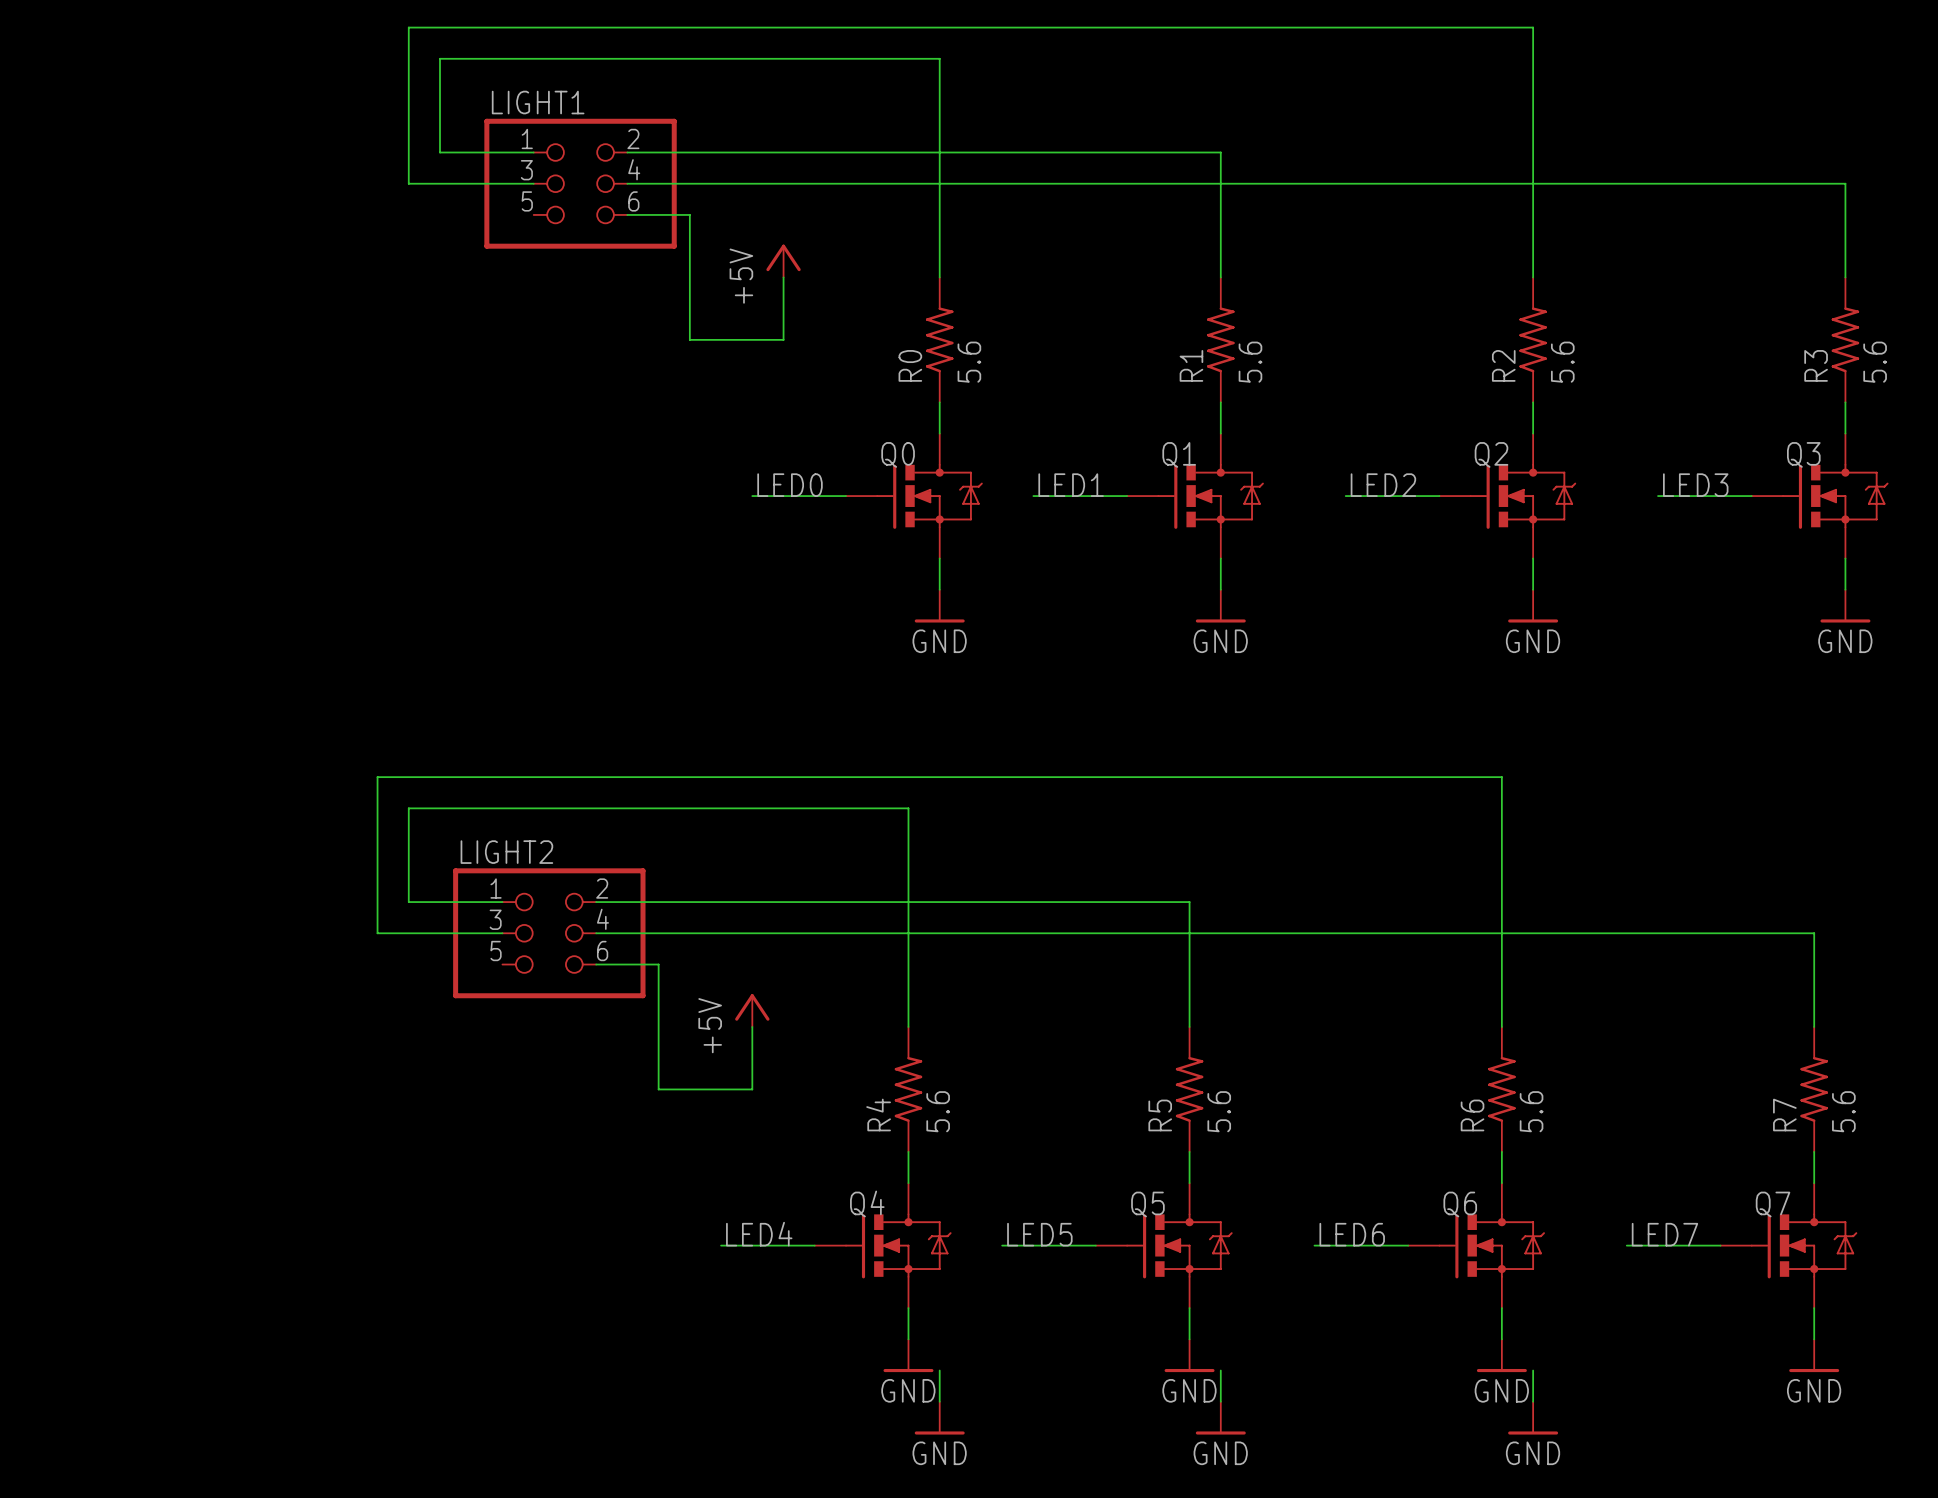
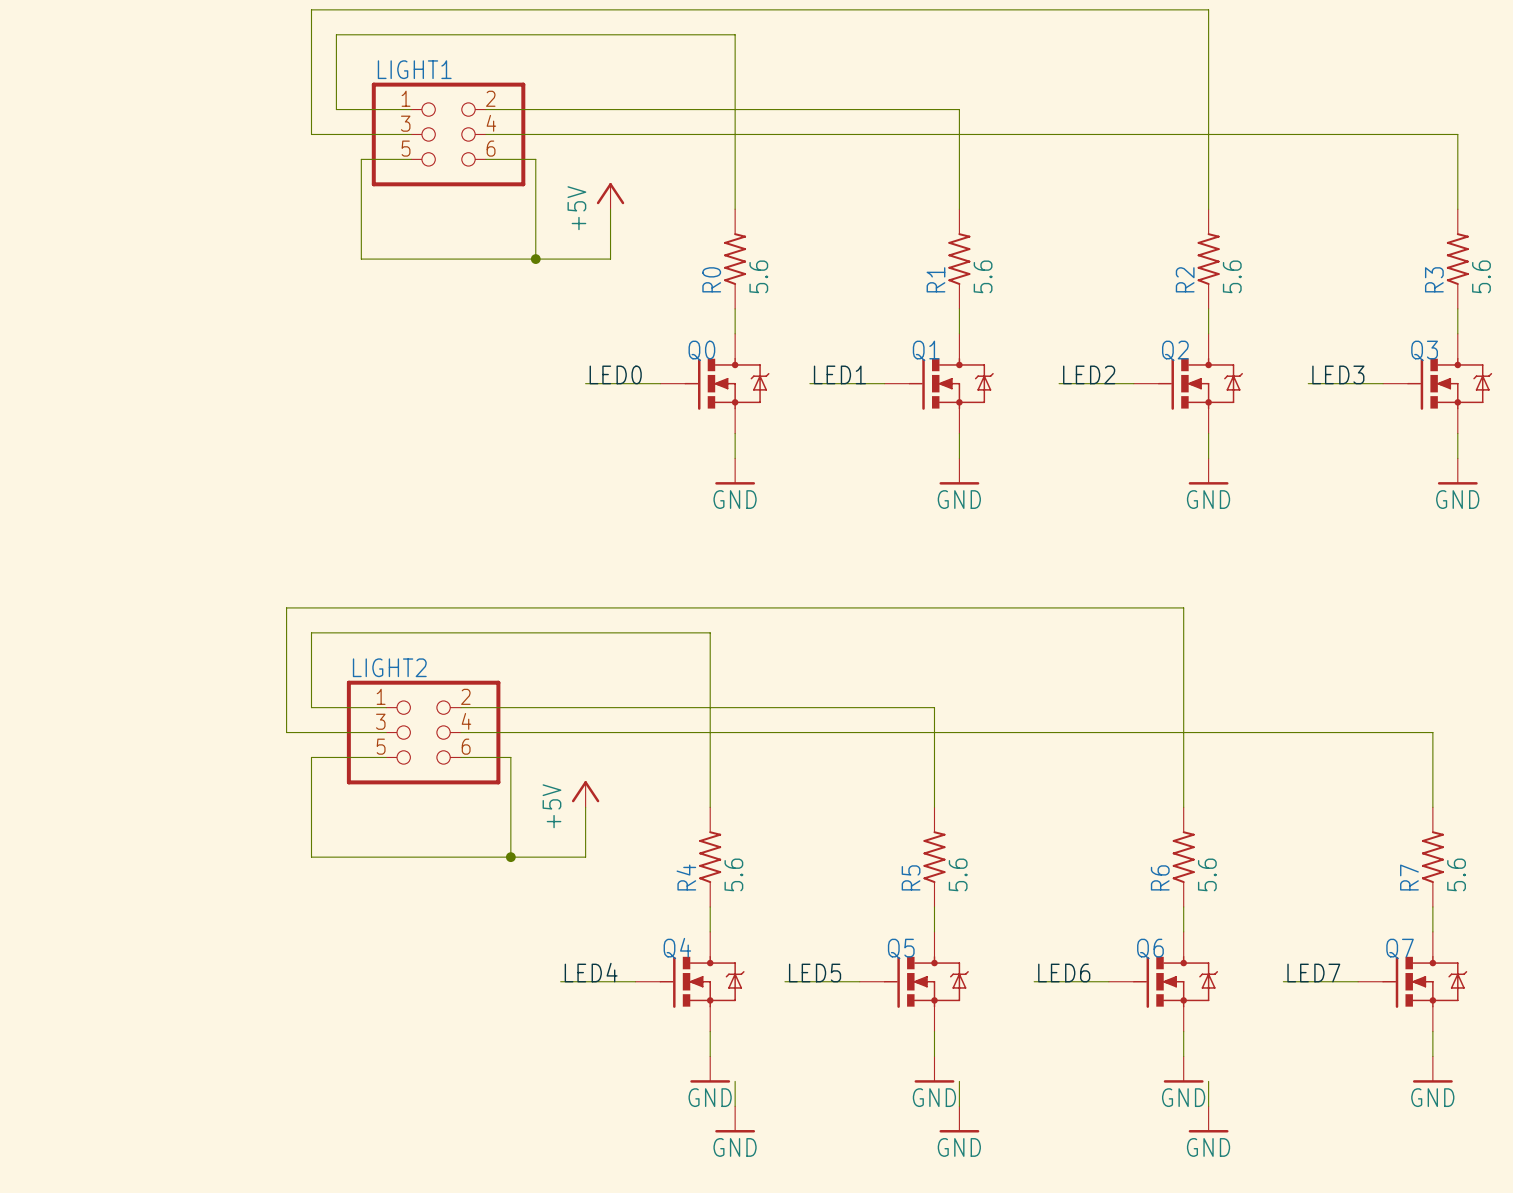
wire: none -> (411, 159) (361, 159) (361, 259) (535, 259)
junction: none -> (535, 259)
wire: none -> (386, 757) (311, 757) (311, 857) (510, 857)
junction: none -> (510, 857)

